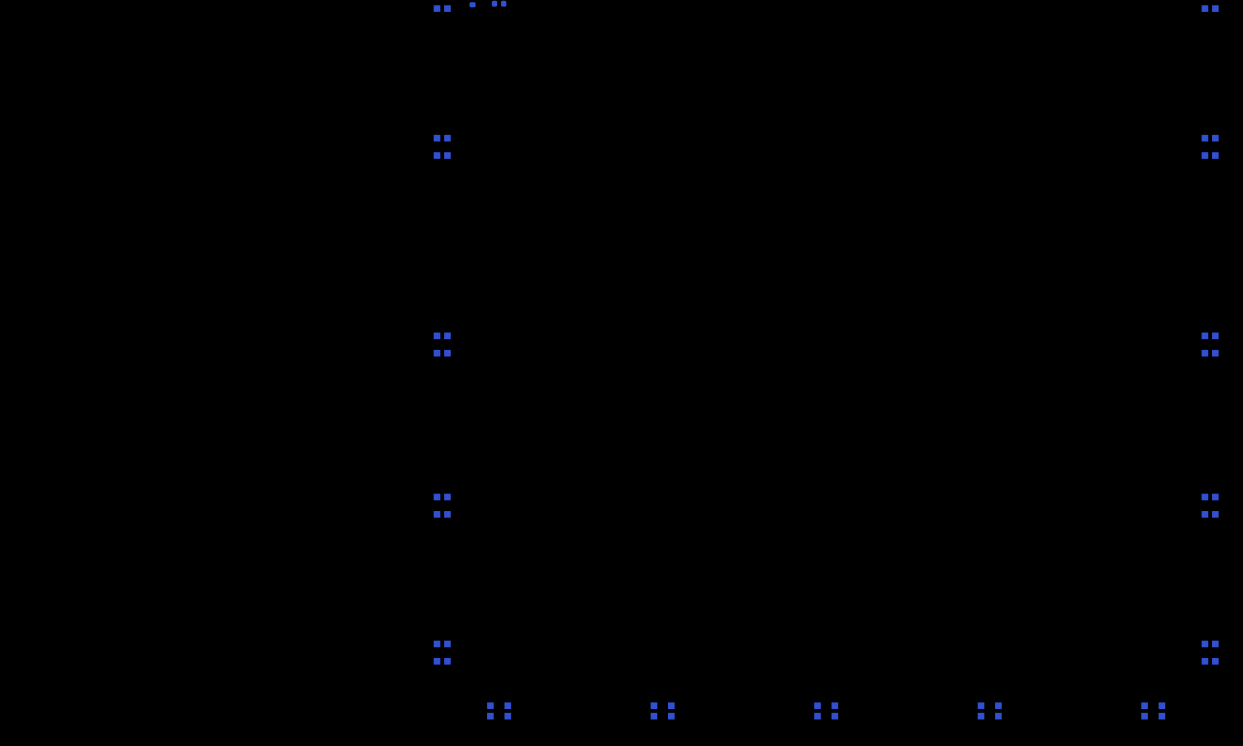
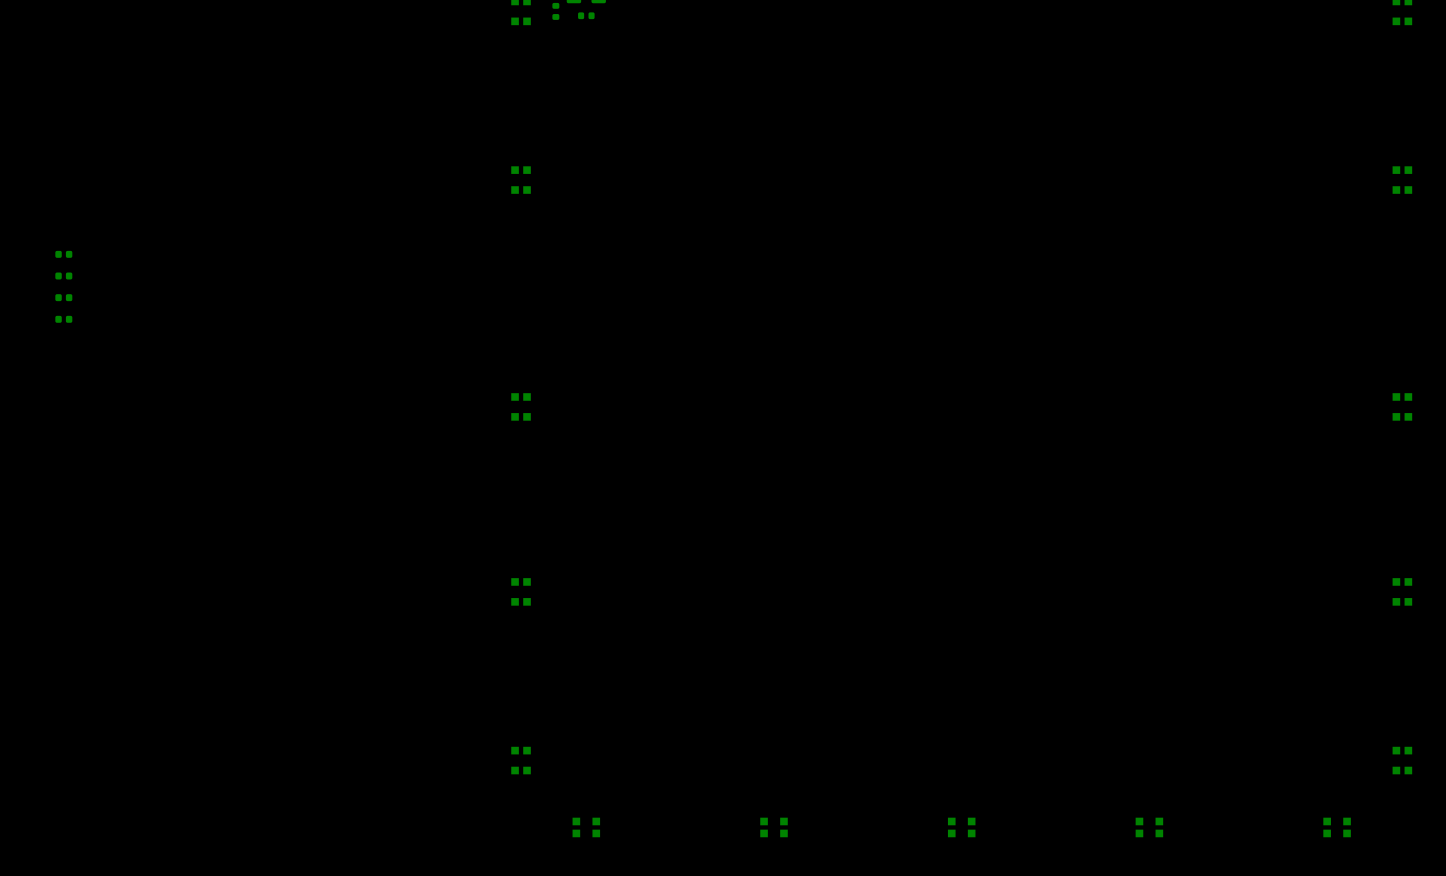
part: none -> (63, 254)
part: none -> (63, 276)
part: none -> (63, 297)
part: none -> (63, 319)

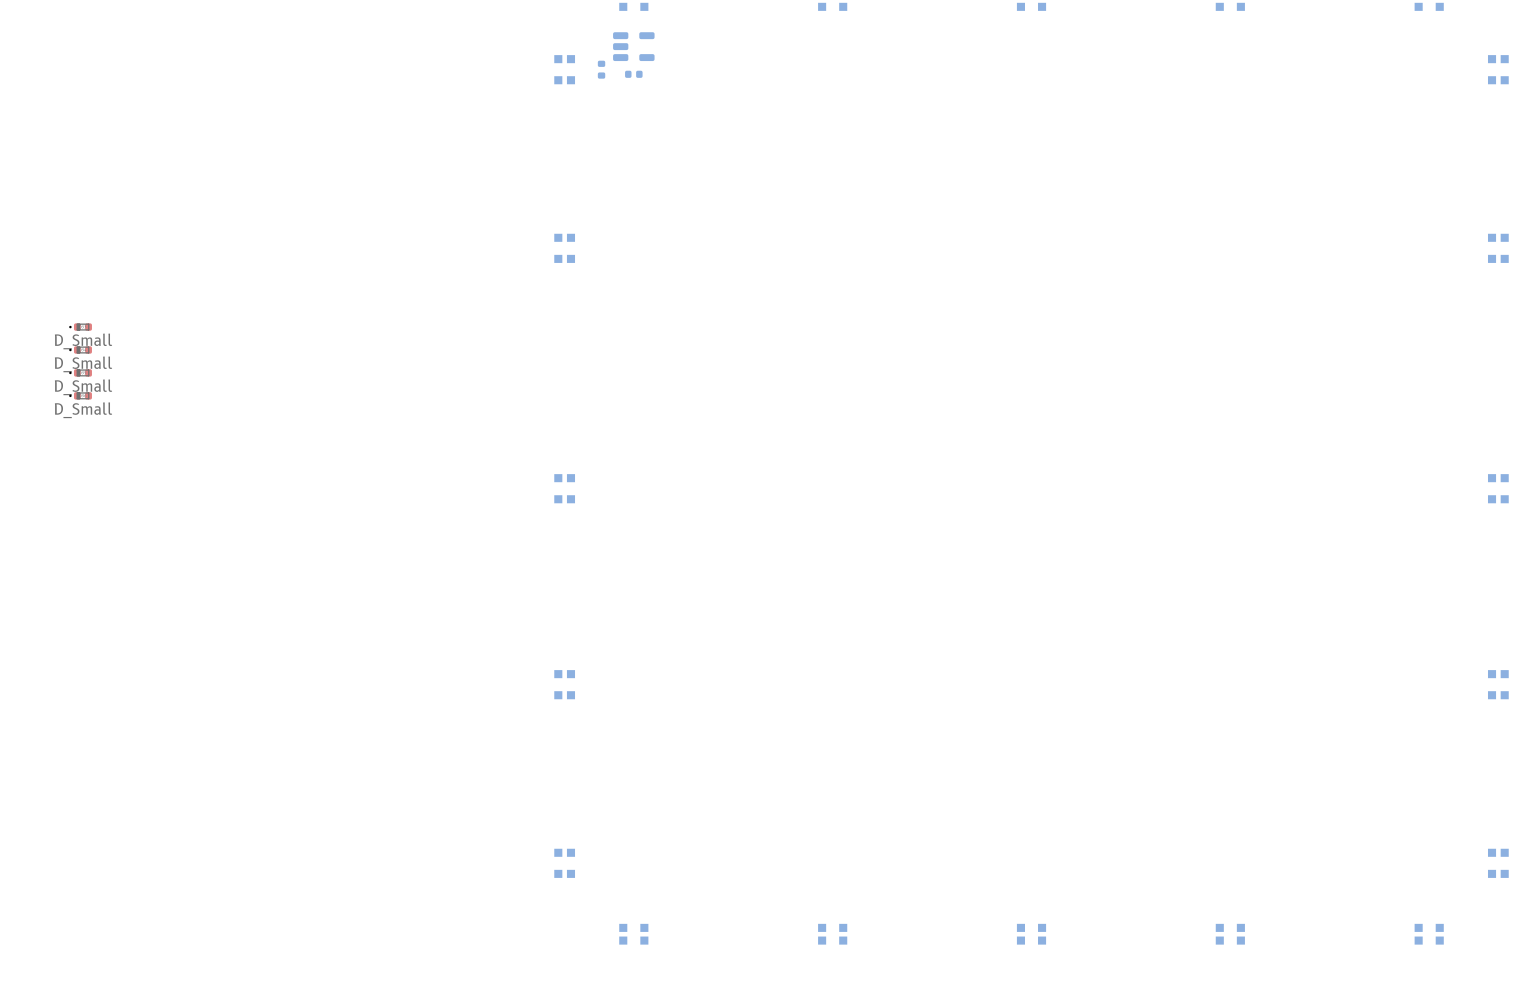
part side: bottom (63, 254) -> top (80, 327)
part side: bottom (63, 276) -> top (80, 349)
part side: bottom (63, 297) -> top (80, 372)
part side: bottom (63, 319) -> top (80, 395)

